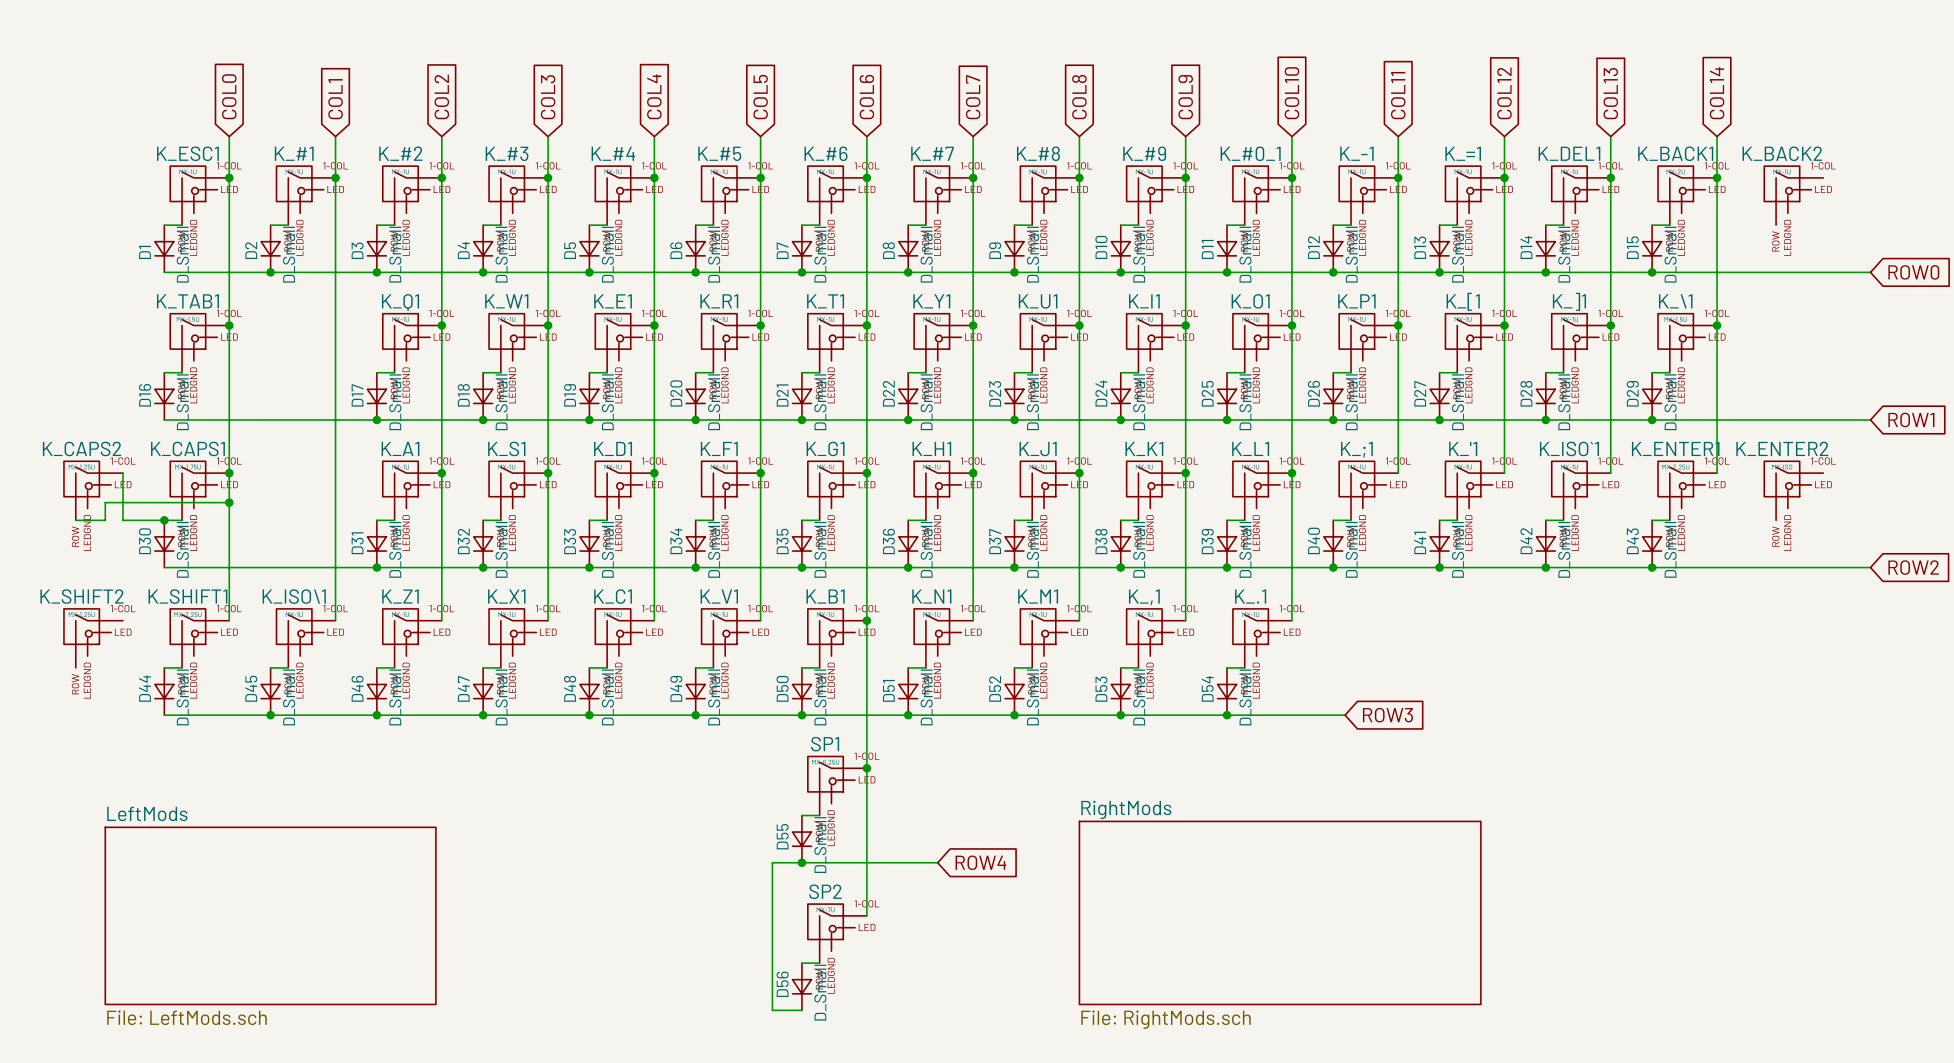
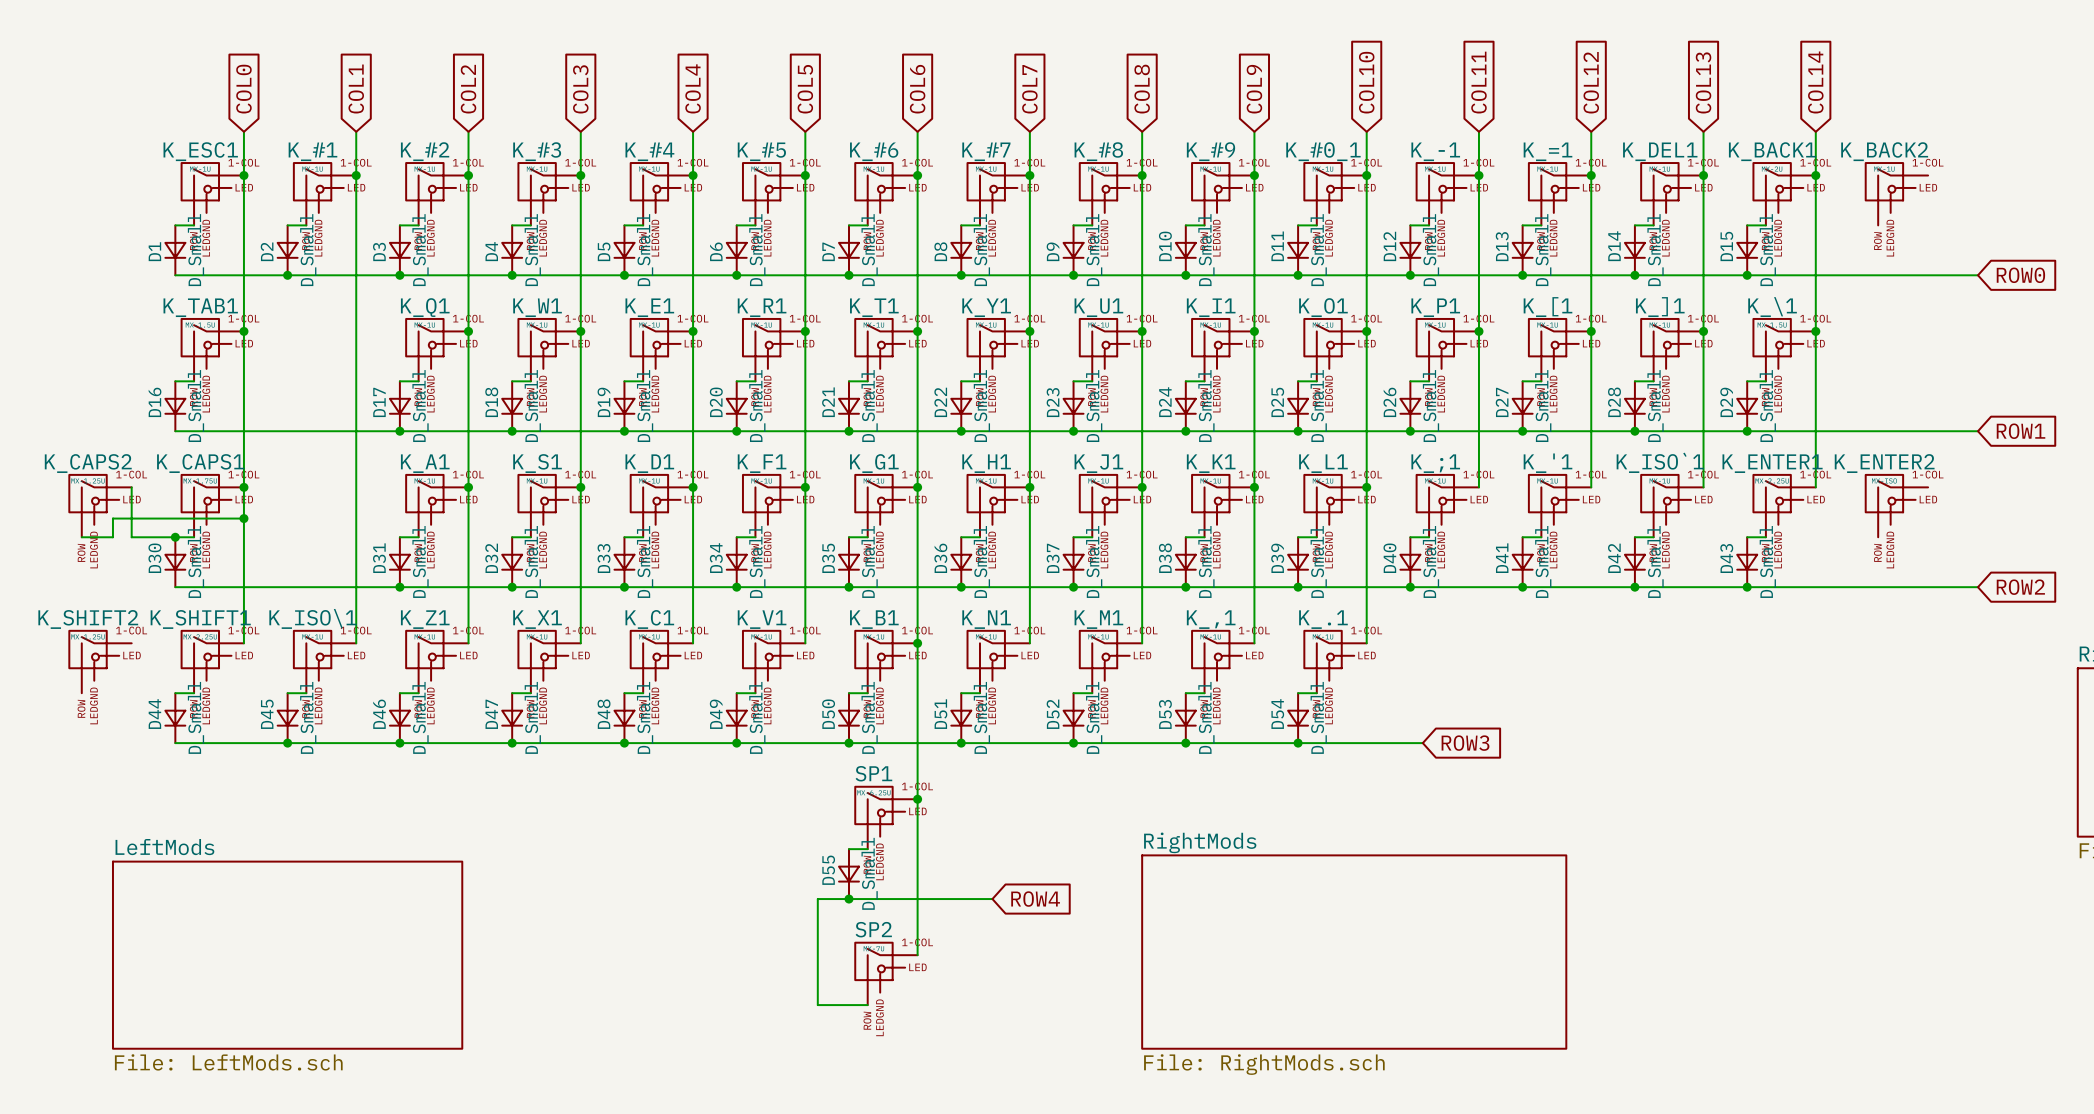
wire: (772, 963) (772, 1010) (801, 1010) -> (817, 1005) (848, 1005)
D56: D_Small (801, 986) -> none

